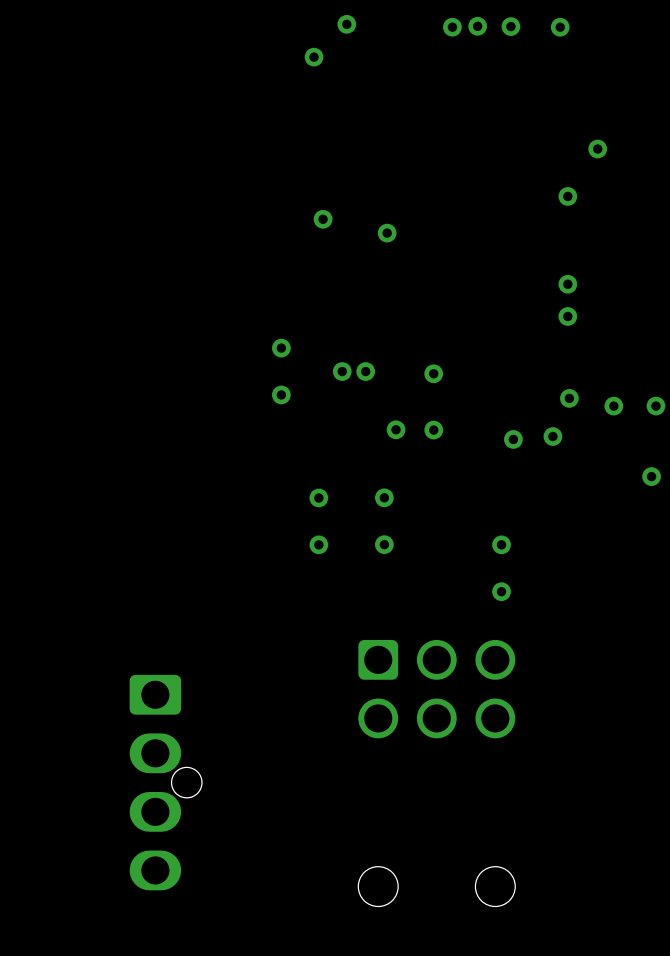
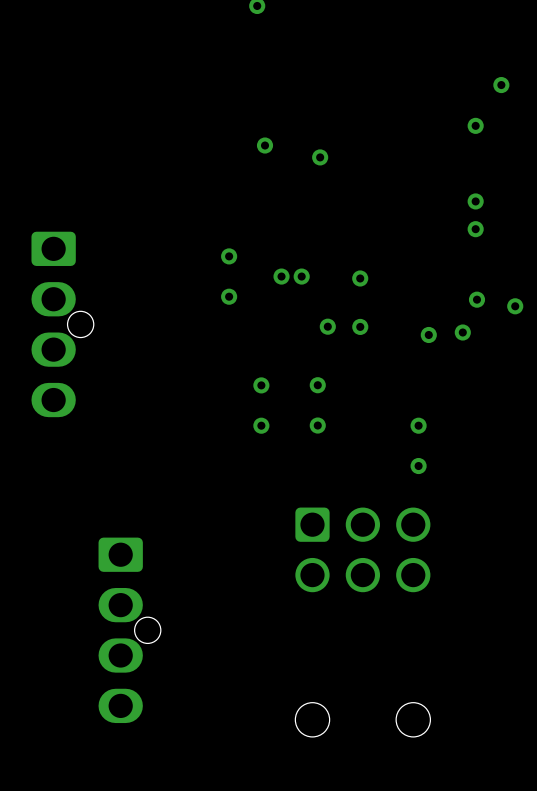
part: none -> (62, 324)

